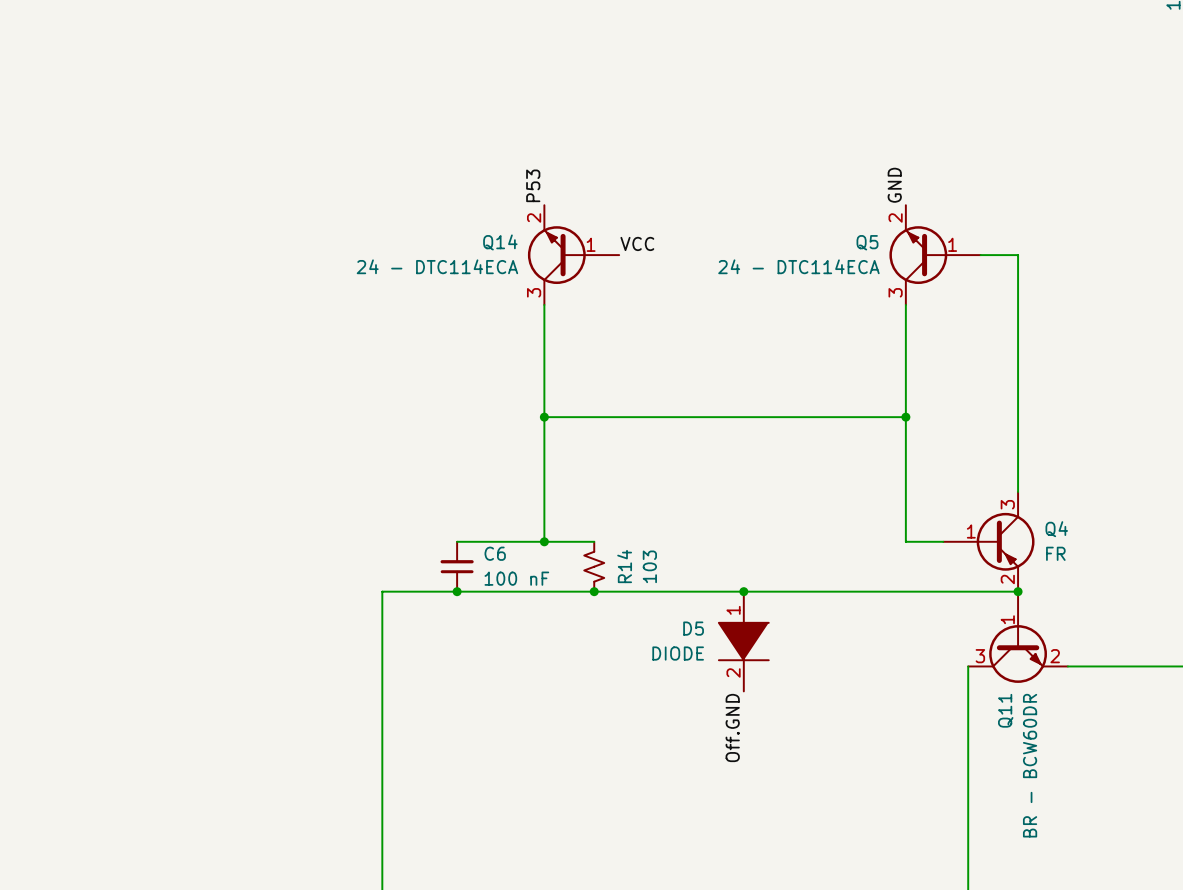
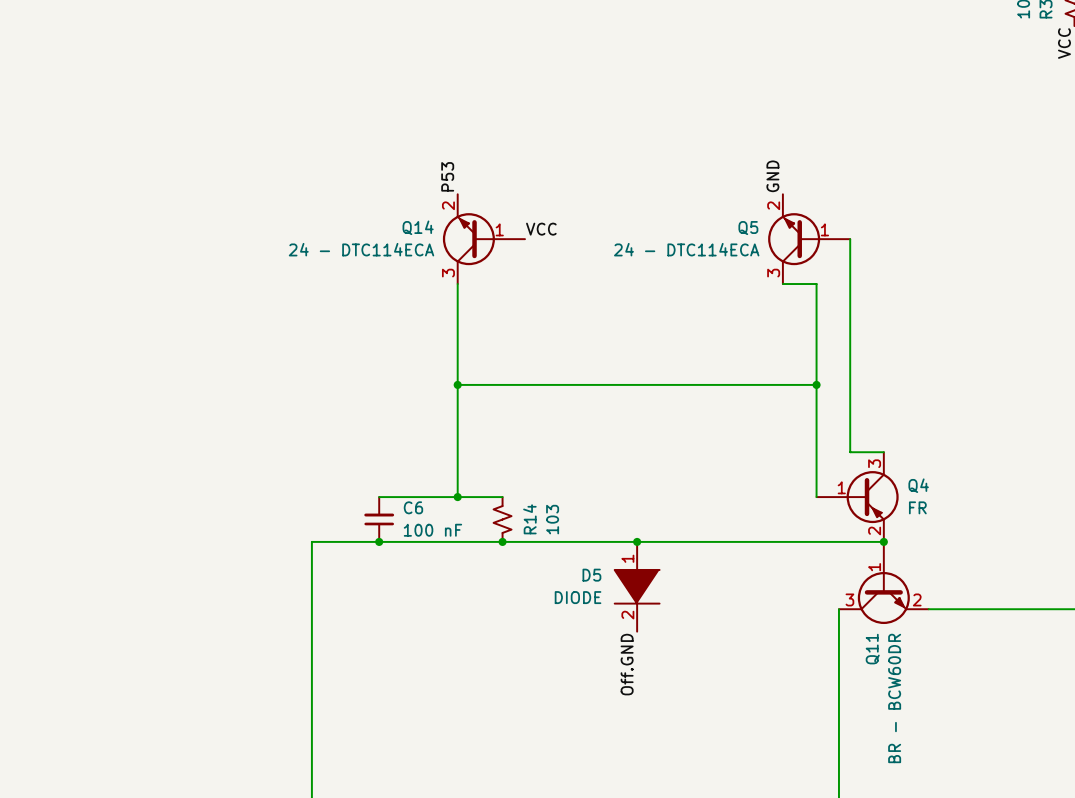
wire: (980, 255) (1018, 255) (1018, 491) -> (850, 239) (850, 452) (883, 452)
wire: (905, 304) (905, 541) (943, 541) -> (782, 284) (816, 284) (816, 497)
wire: none -> (782, 384) (816, 384)
junction position: (905, 417) -> (816, 384)

